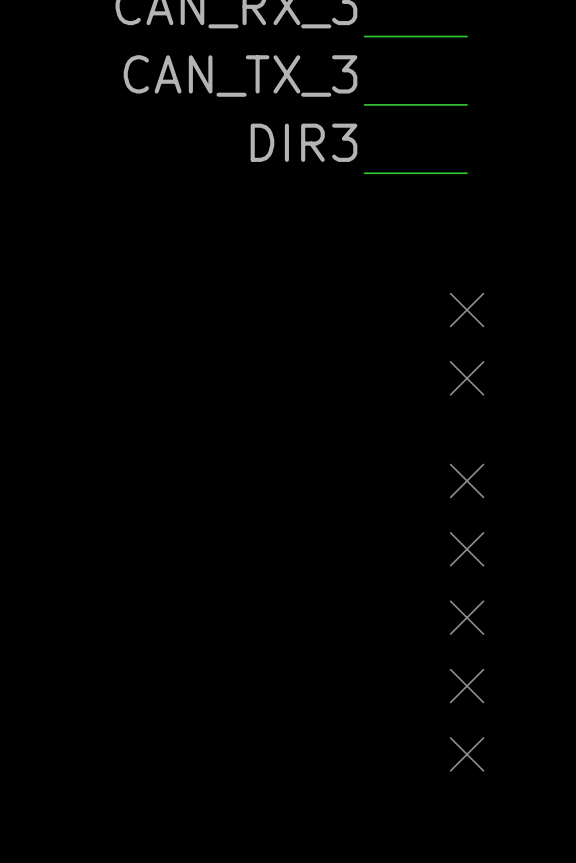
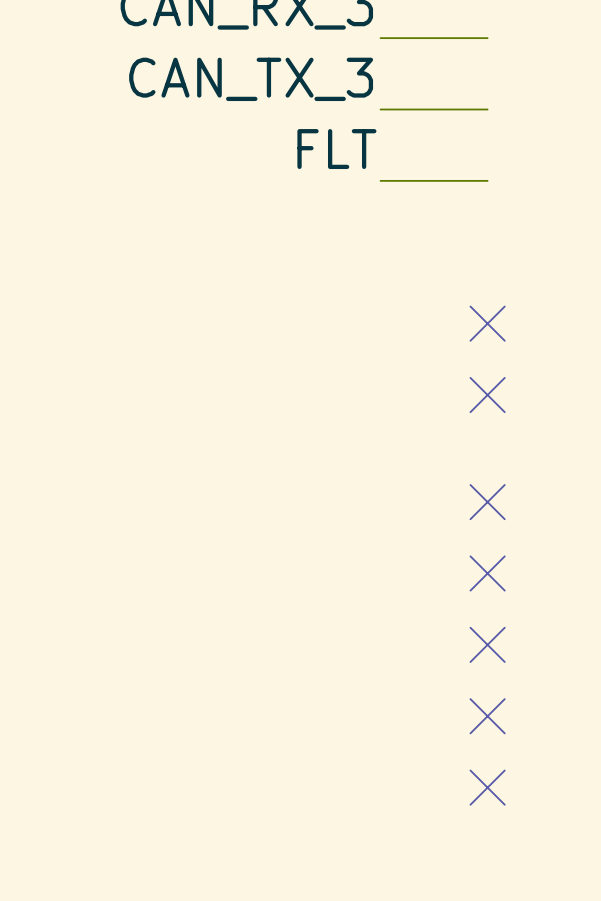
label: DIR3 (304, 142) -> FLT (336, 149)

